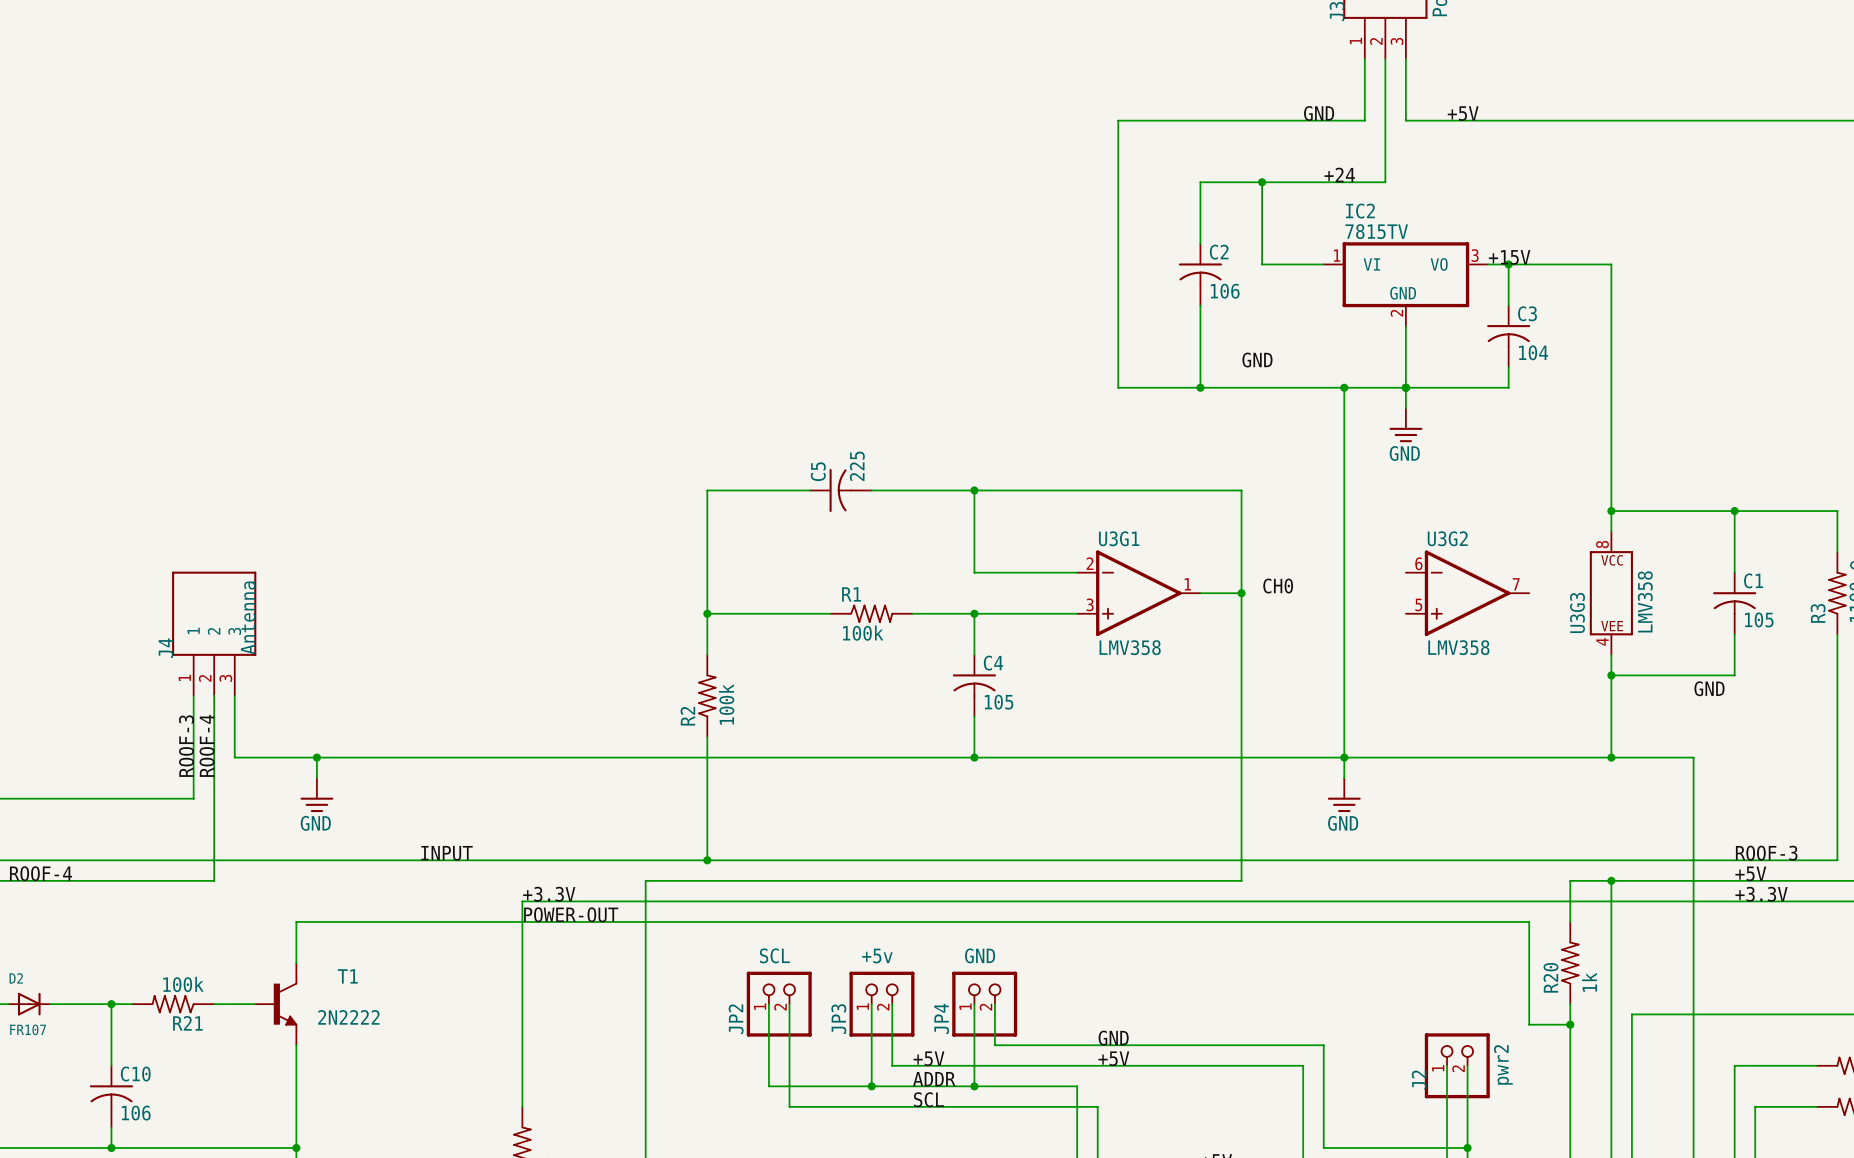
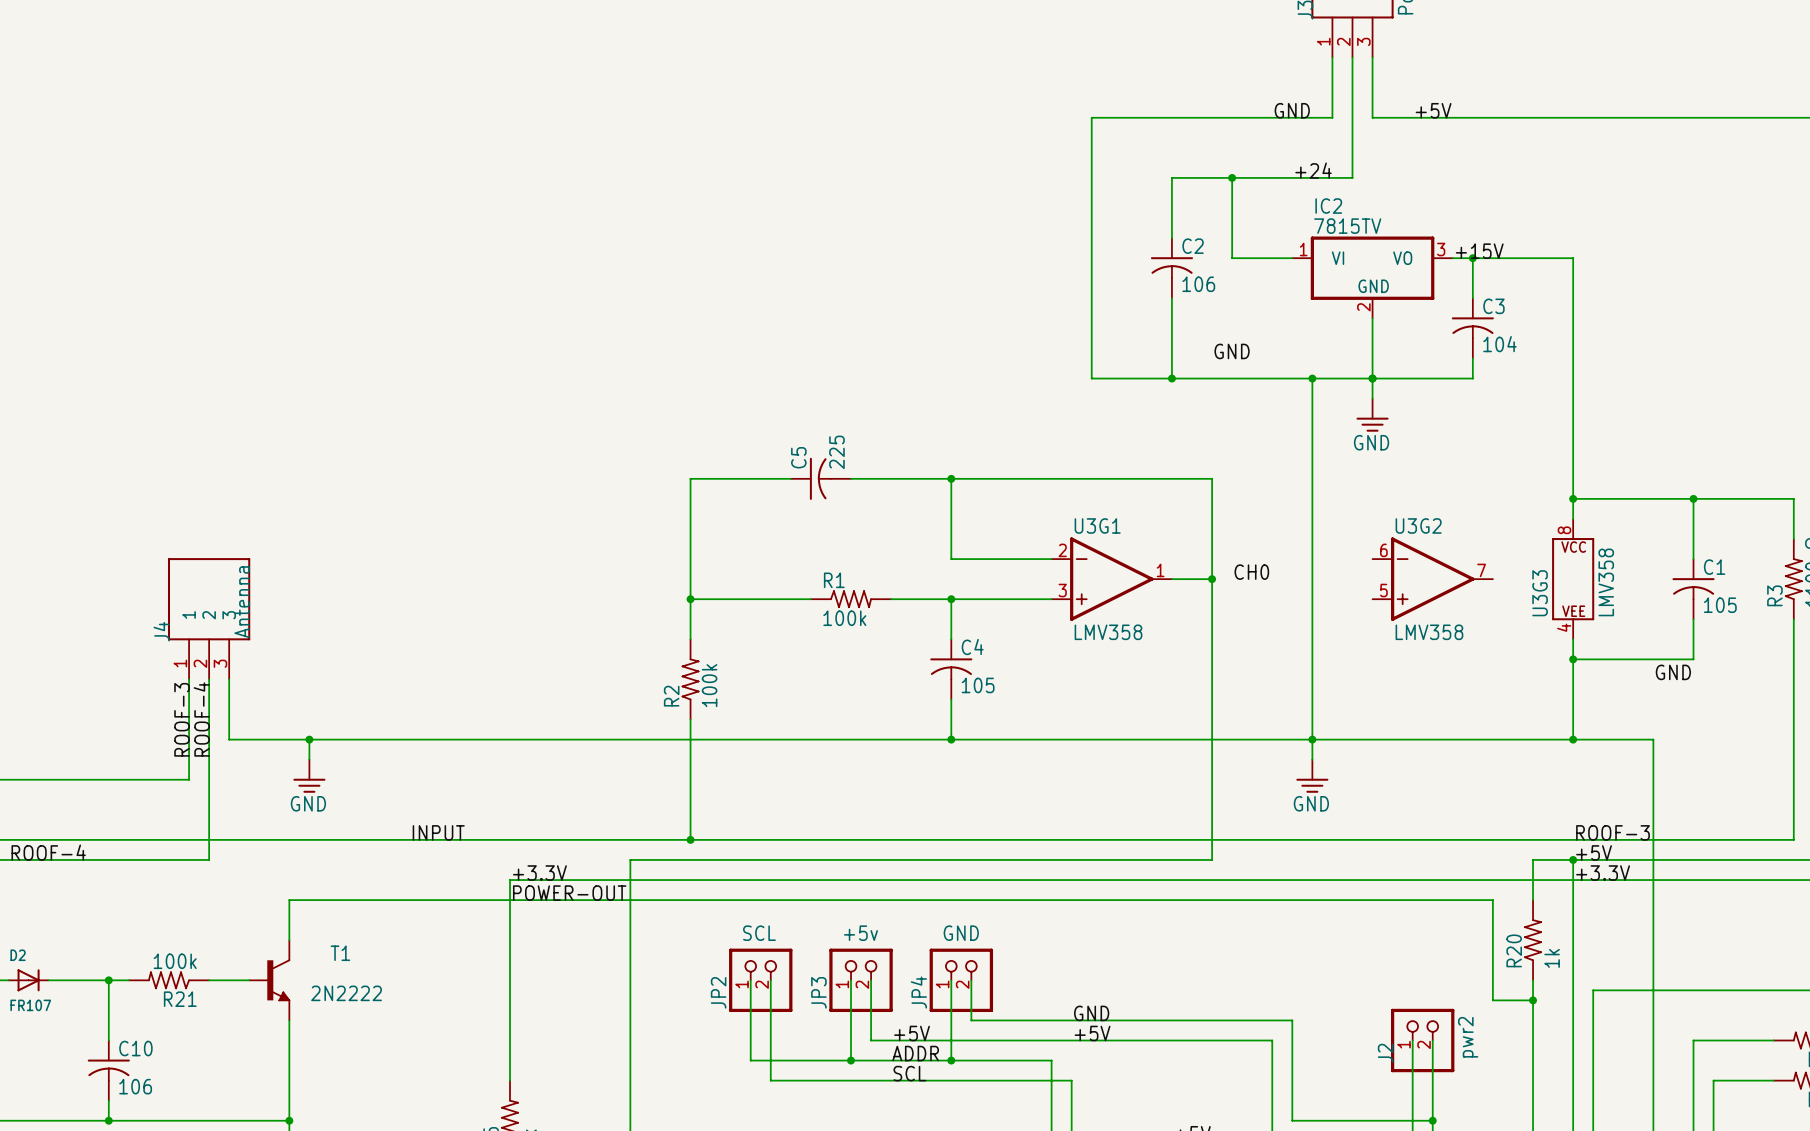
label position: ROOF-3 (1766, 853) -> ROOF-3 (1613, 832)
label position: +5V (1750, 873) -> +5V (1594, 852)
label position: +3.3V (1761, 894) -> +3.3V (1603, 873)

